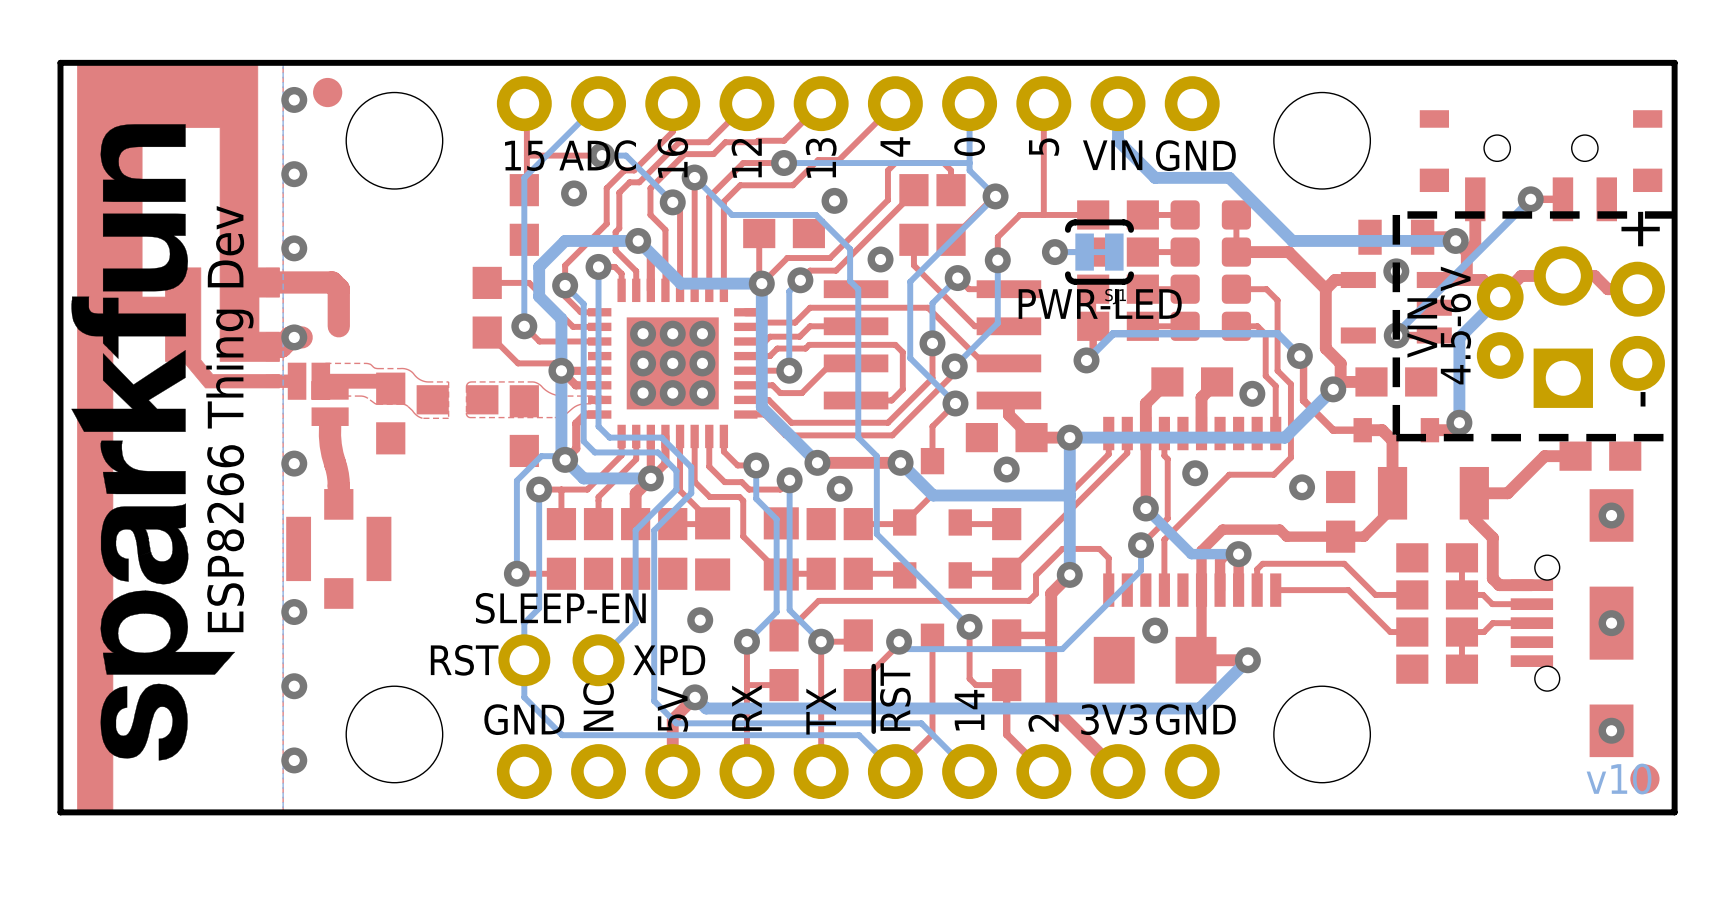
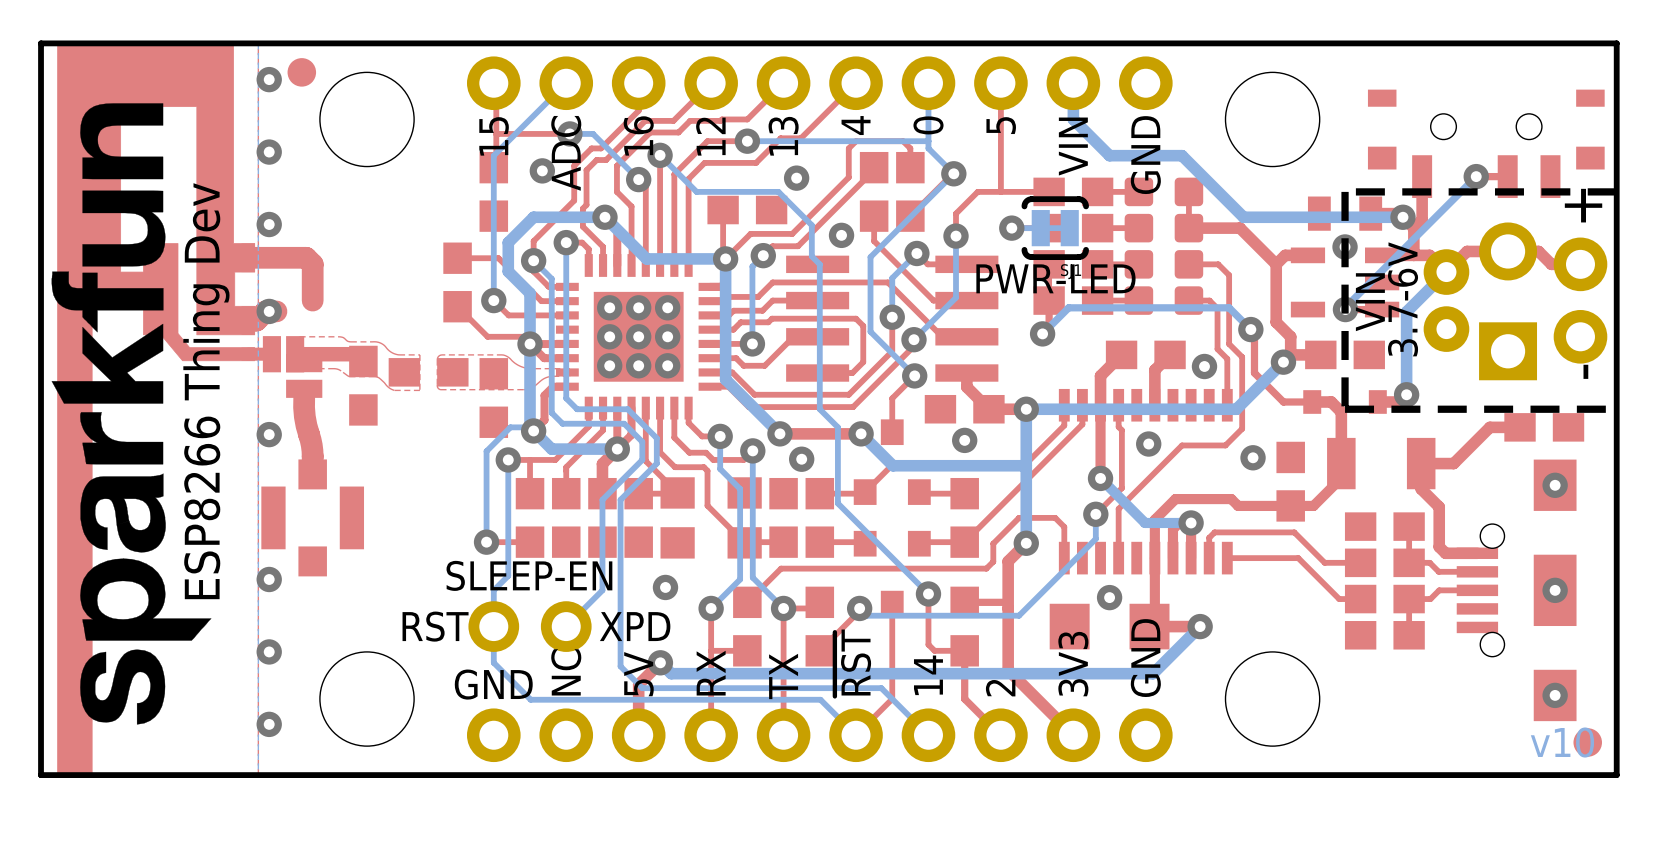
text rotation: 0° (524, 155) -> 90° counterclockwise (494, 136)
text rotation: 0° (597, 155) -> 90° counterclockwise (566, 153)
text rotation: 0° (1112, 155) -> 90° counterclockwise (1073, 146)
text rotation: 0° (1195, 155) -> 90° counterclockwise (1145, 155)
text: 4.5-6V (1455, 325) -> 3.7-6V (1403, 299)
text rotation: 0° (1114, 719) -> 90° counterclockwise (1073, 664)
text rotation: 0° (1195, 719) -> 90° counterclockwise (1145, 658)

